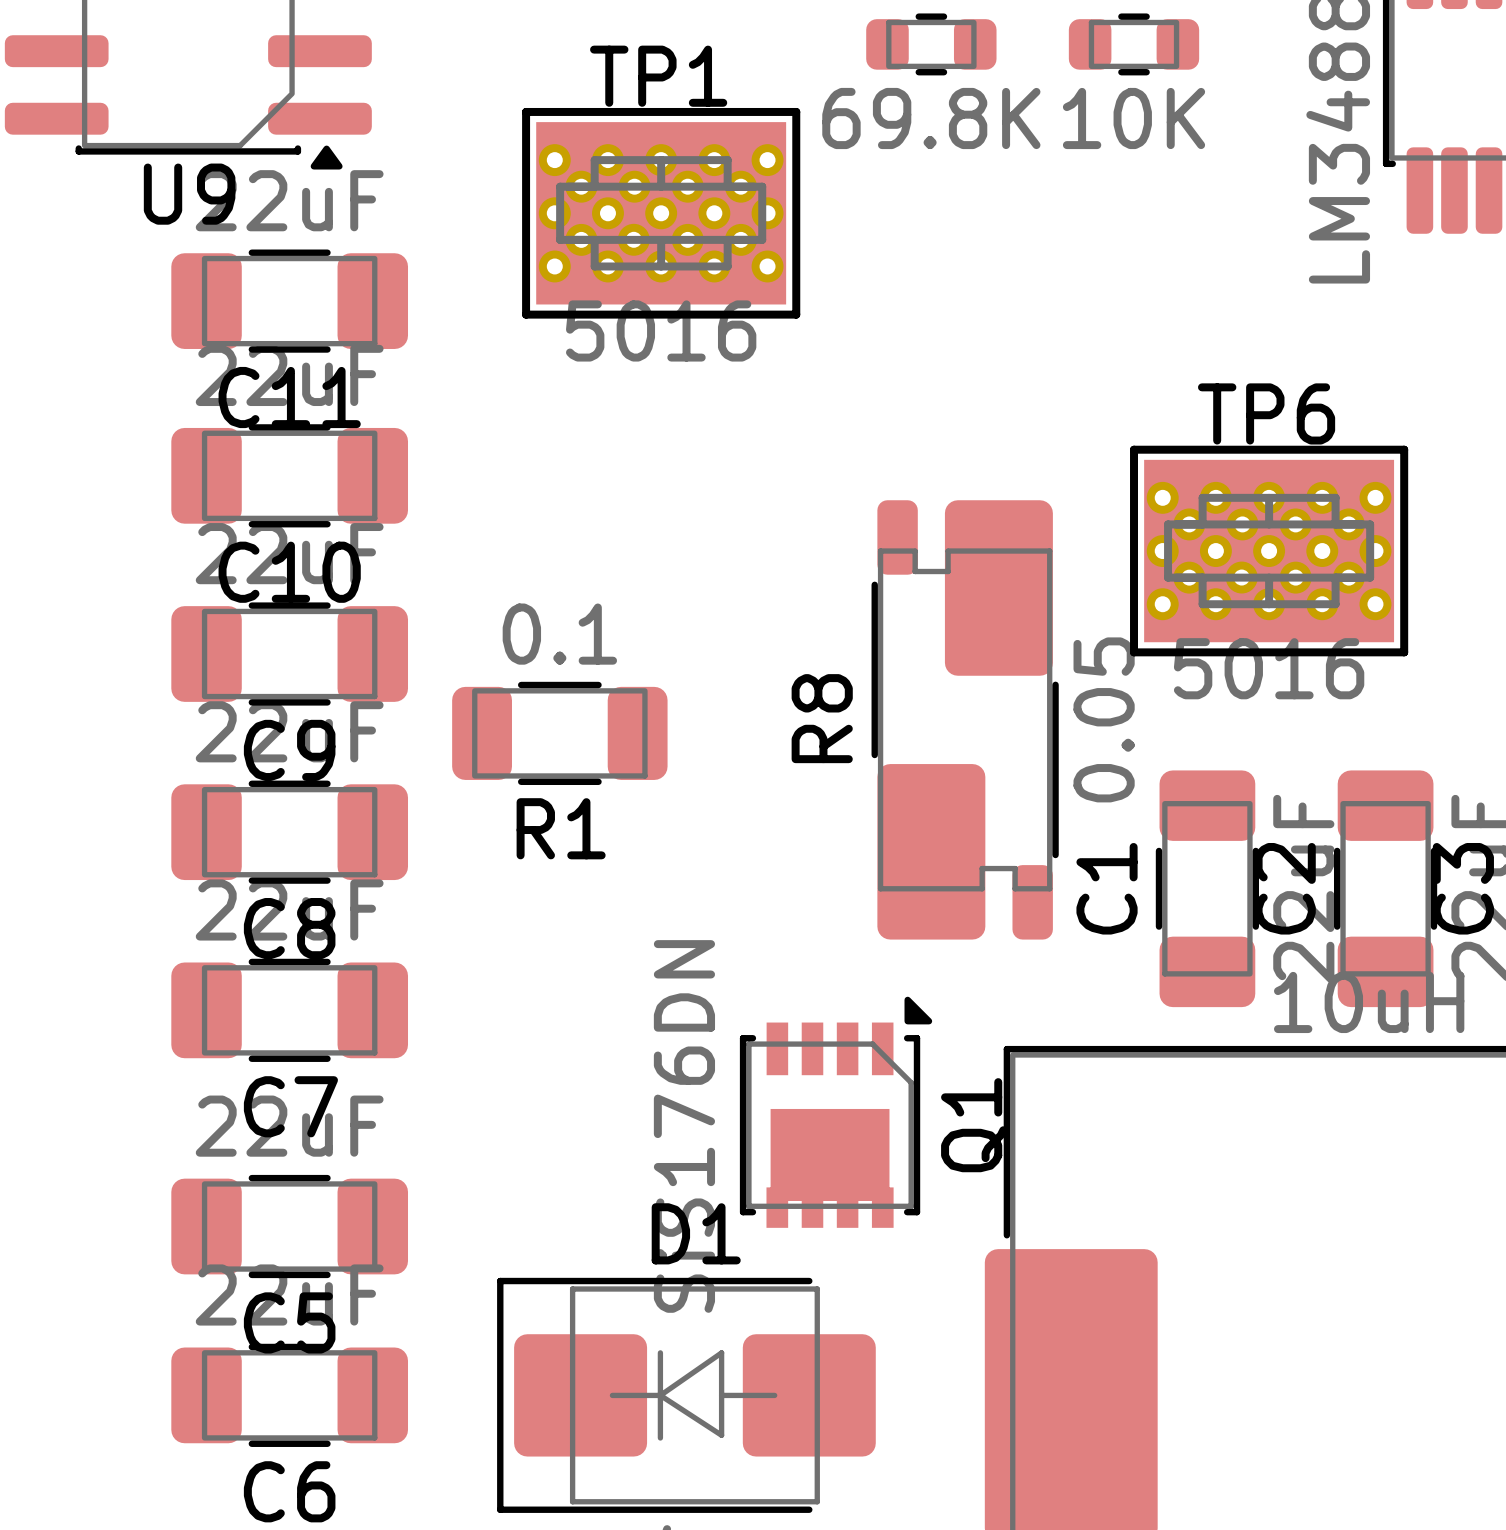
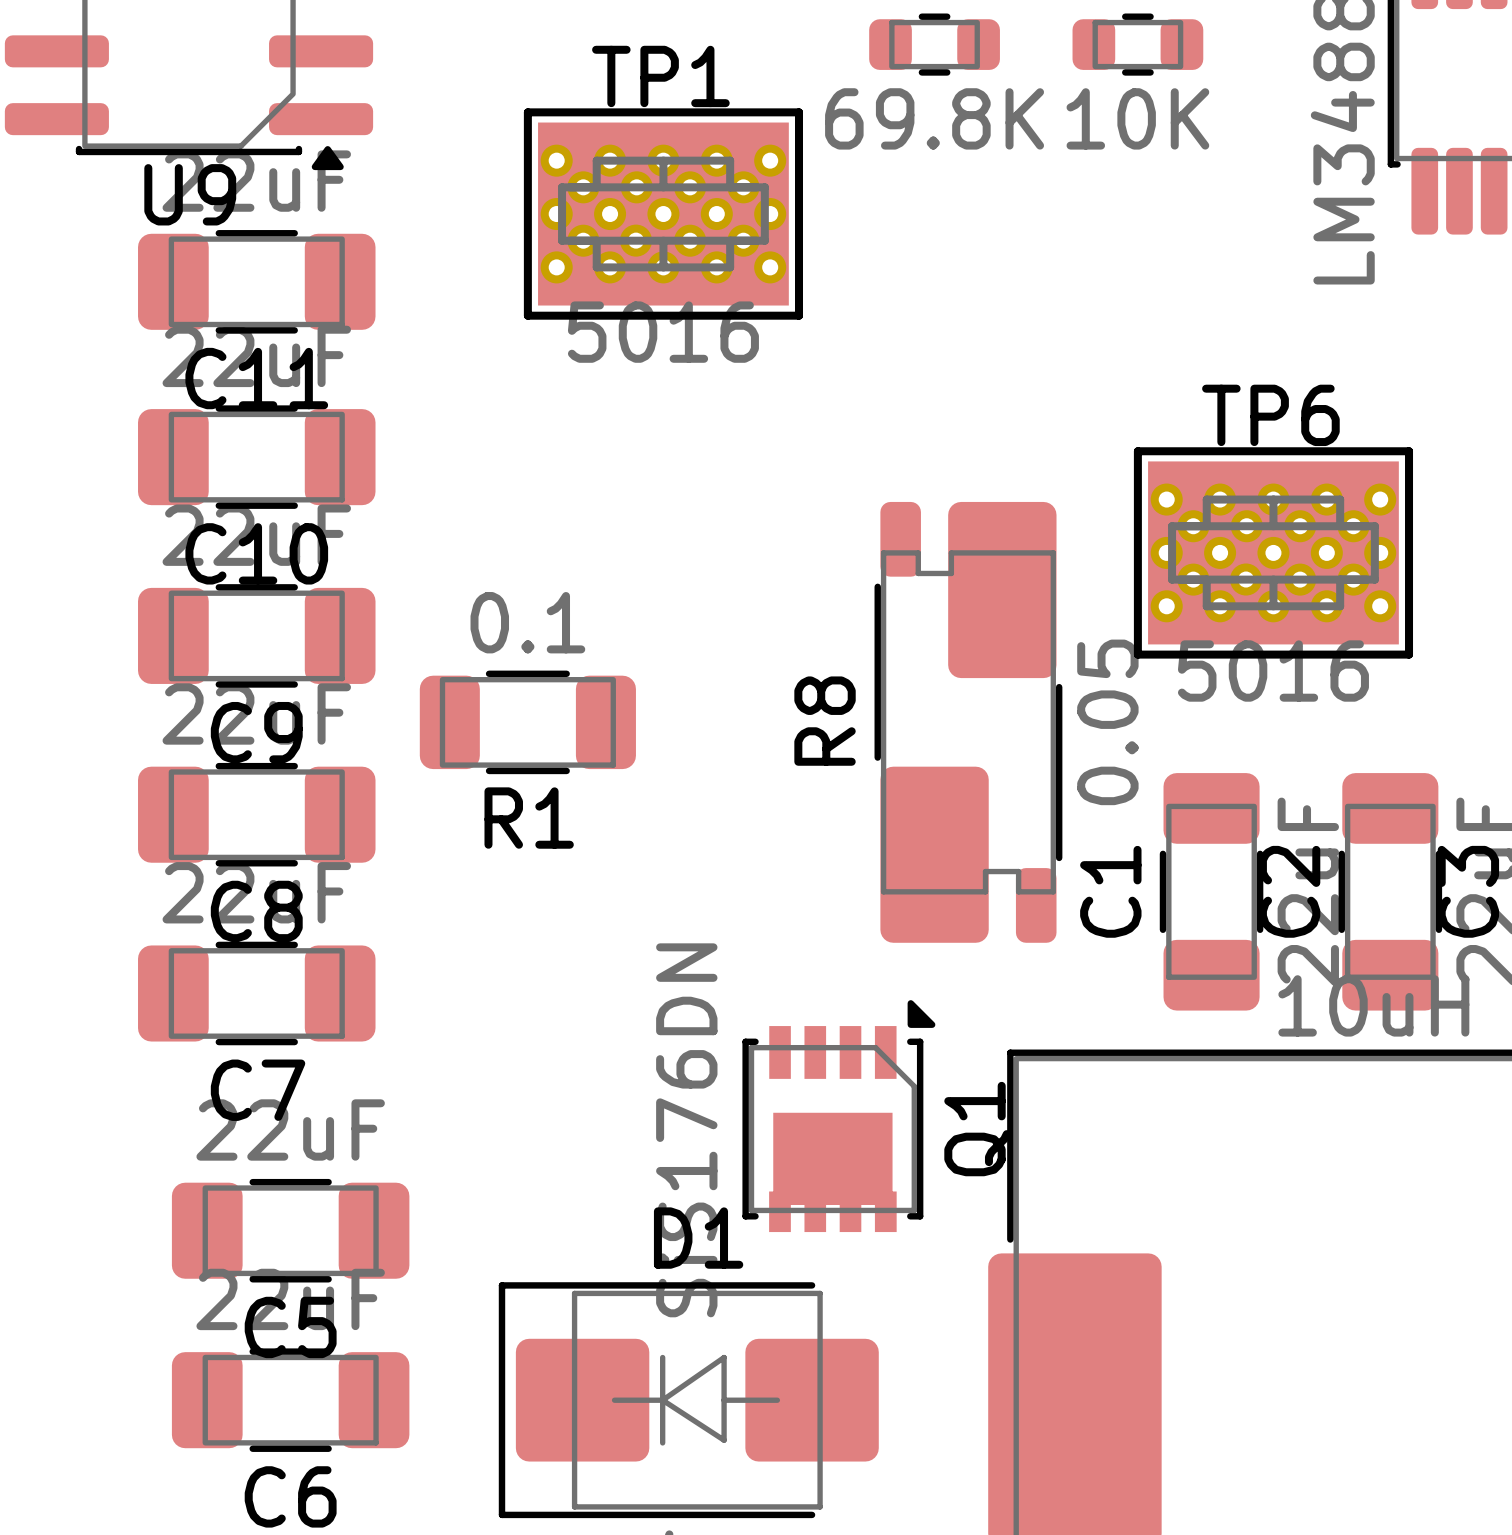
C11 position: (289, 301) -> (256, 281)
C10 position: (289, 475) -> (256, 457)
C9 position: (289, 654) -> (256, 635)
R1 position: (559, 733) -> (527, 722)
C8 position: (289, 832) -> (256, 814)
C7 position: (289, 1010) -> (256, 993)

